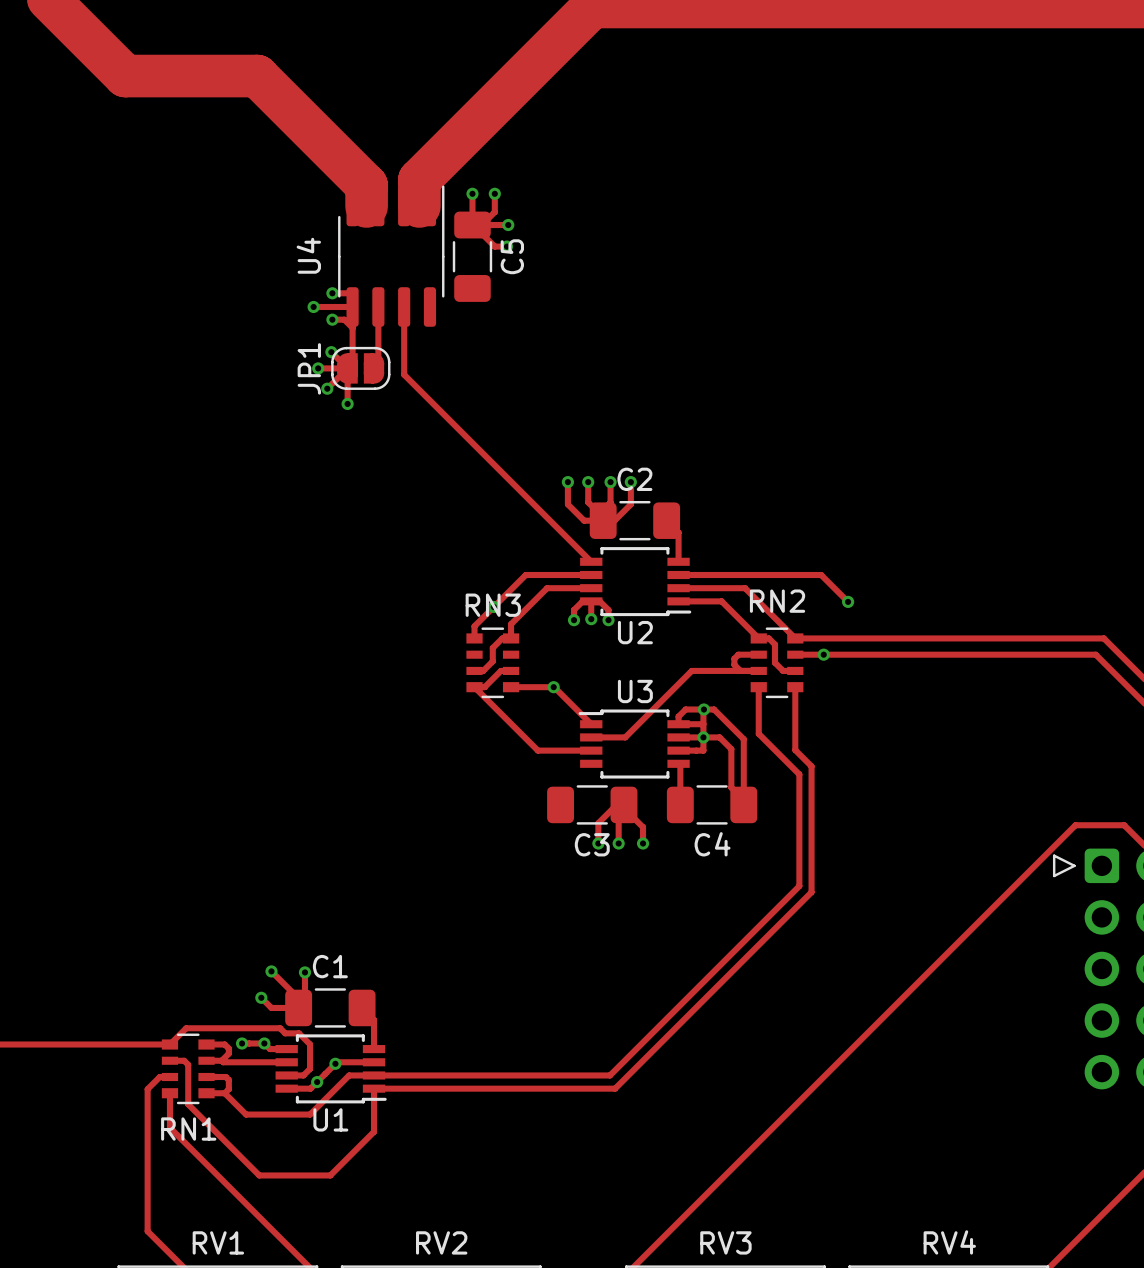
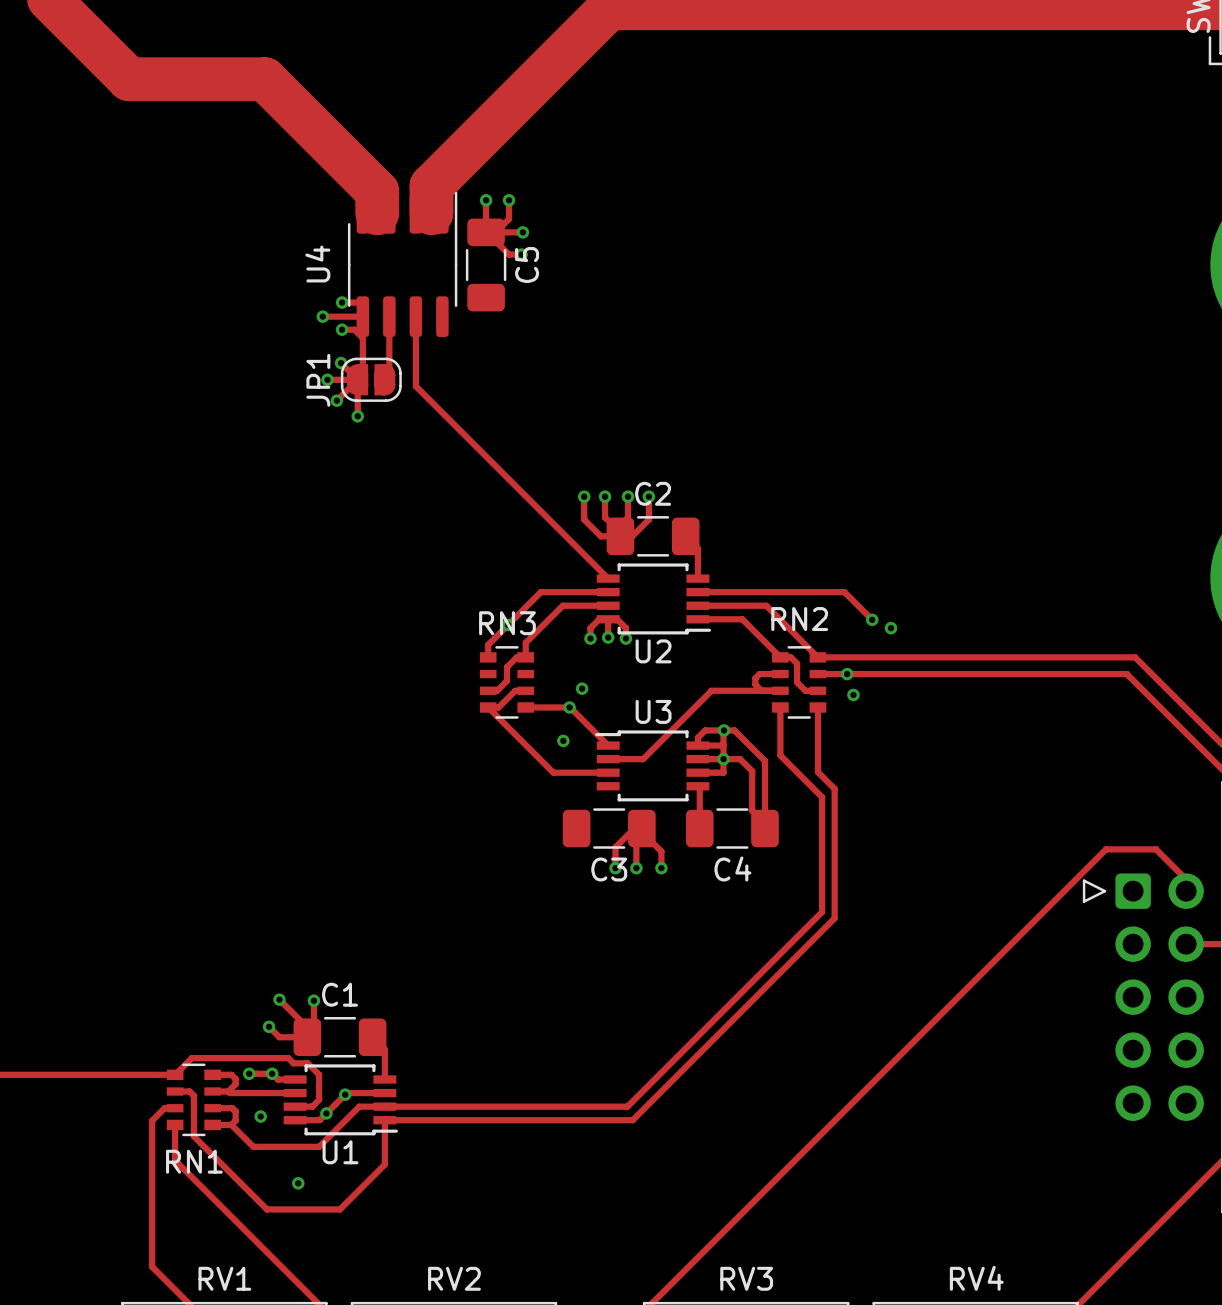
via: none -> (891, 628)
via: none -> (582, 688)
via: none -> (853, 694)
via: none -> (563, 740)
via: none -> (260, 1116)
via: none -> (298, 1183)

